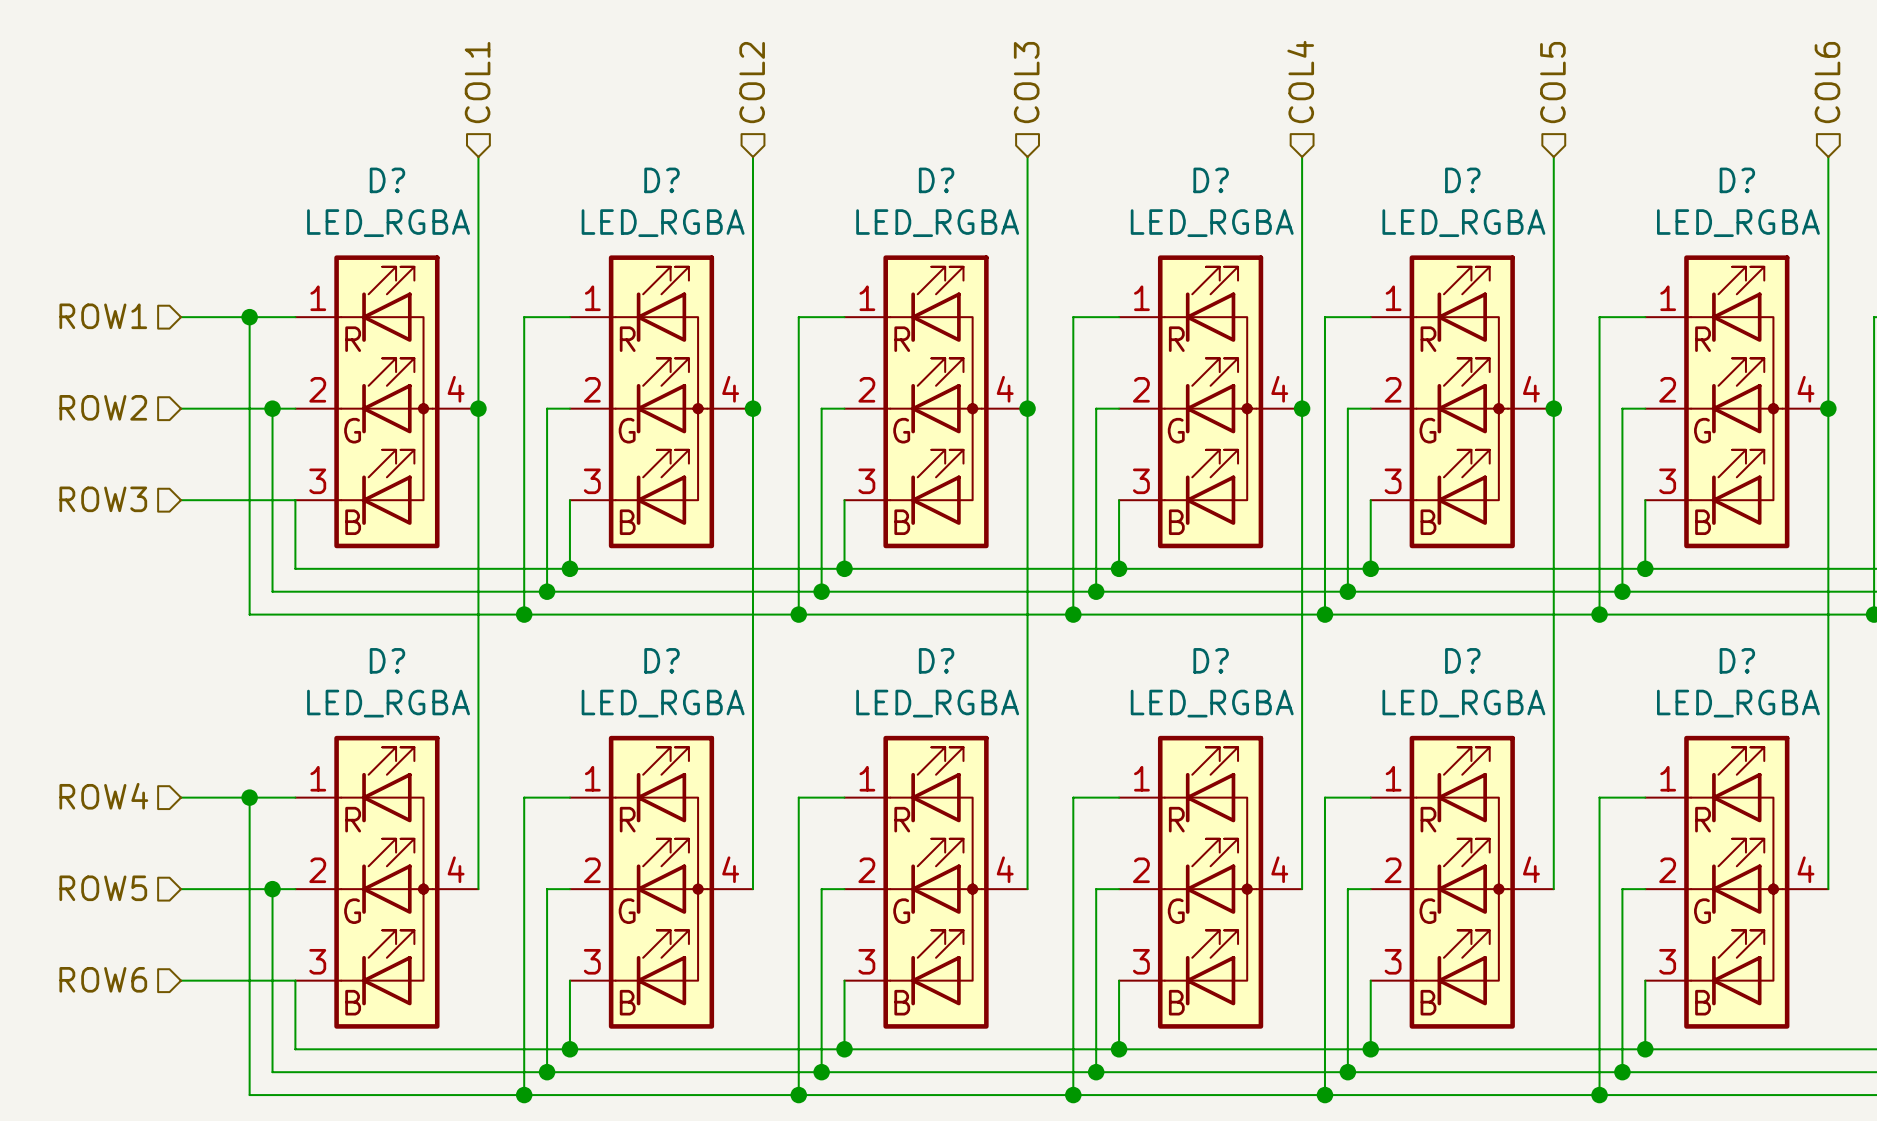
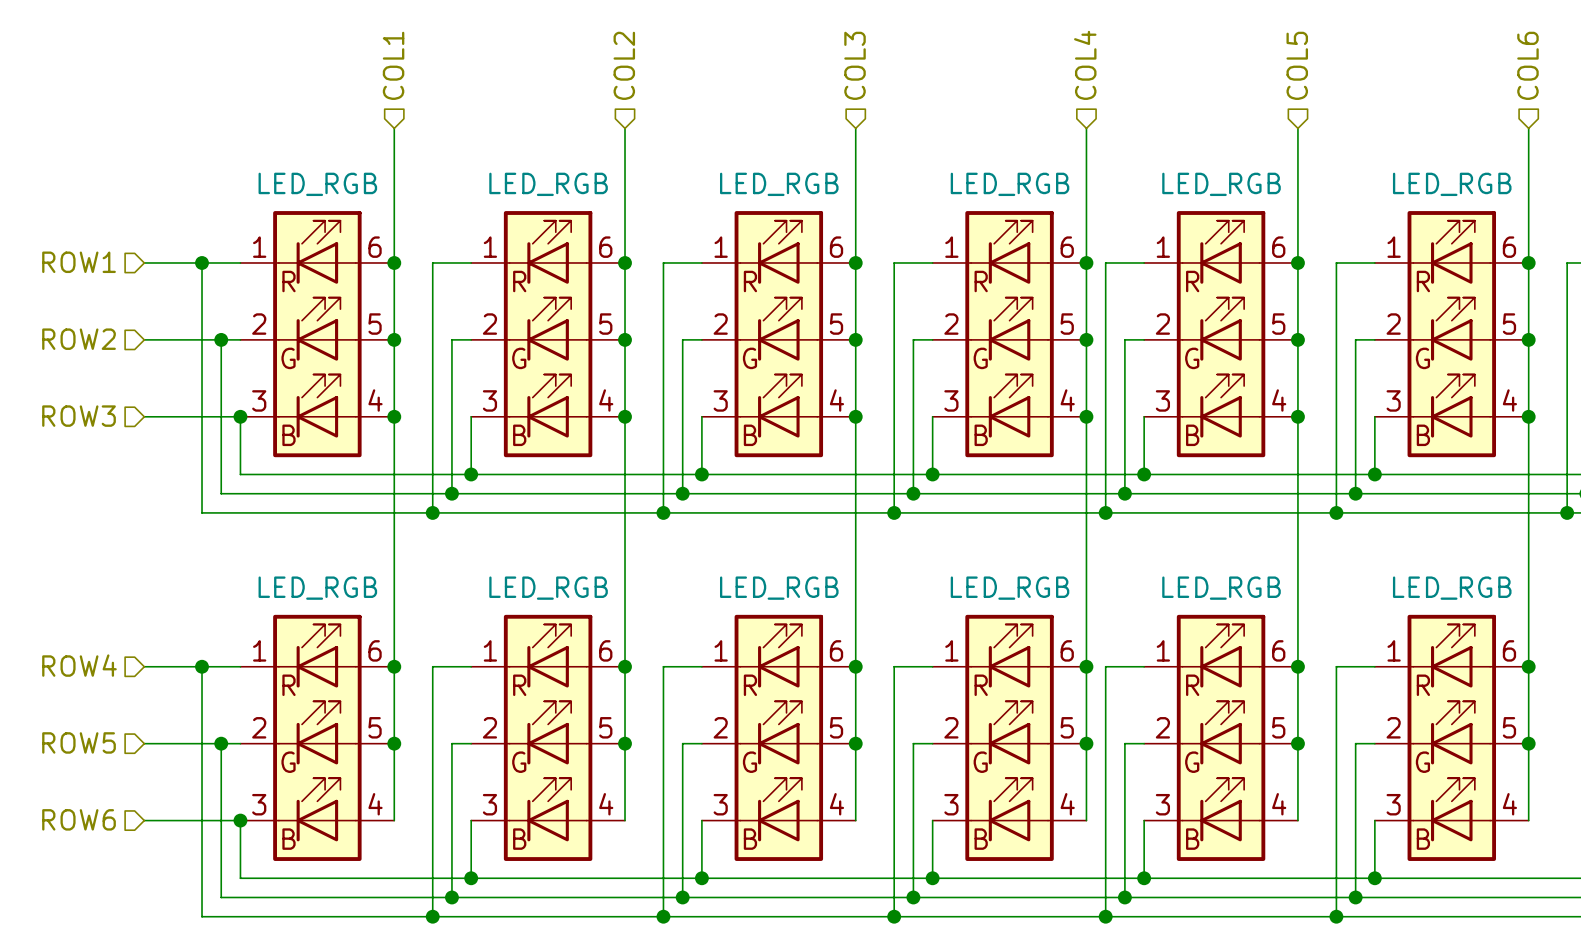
junction: none -> (394, 262)
junction: none -> (625, 262)
junction: none -> (855, 262)
junction: none -> (1086, 262)
junction: none -> (1297, 262)
junction: none -> (1528, 262)
D?: LED_RGBA (386, 401) -> none
part: none -> LED_RGB (317, 334)
D?: LED_RGBA (661, 401) -> none
part: none -> LED_RGB (548, 334)
D?: LED_RGBA (936, 401) -> none
part: none -> LED_RGB (778, 334)
D?: LED_RGBA (1210, 401) -> none
part: none -> LED_RGB (1009, 334)
D?: LED_RGBA (1462, 401) -> none
part: none -> LED_RGB (1221, 334)
D?: LED_RGBA (1736, 401) -> none
part: none -> LED_RGB (1451, 334)
junction: none -> (240, 416)
junction: none -> (394, 416)
junction: none -> (625, 416)
junction: none -> (855, 416)
junction: none -> (1086, 416)
junction: none -> (1297, 416)
junction: none -> (1528, 416)
junction: none -> (394, 666)
junction: none -> (625, 666)
junction: none -> (855, 666)
junction: none -> (1086, 666)
junction: none -> (1297, 666)
junction: none -> (1528, 666)
D?: LED_RGBA (386, 882) -> none
part: none -> LED_RGB (317, 737)
D?: LED_RGBA (661, 882) -> none
part: none -> LED_RGB (548, 737)
D?: LED_RGBA (936, 882) -> none
part: none -> LED_RGB (778, 737)
D?: LED_RGBA (1210, 882) -> none
part: none -> LED_RGB (1009, 737)
D?: LED_RGBA (1462, 882) -> none
part: none -> LED_RGB (1221, 737)
D?: LED_RGBA (1736, 882) -> none
part: none -> LED_RGB (1451, 737)
wire: none -> (394, 743) (394, 820)
junction: none -> (394, 743)
wire: none -> (625, 743) (625, 820)
junction: none -> (625, 743)
wire: none -> (855, 743) (855, 820)
junction: none -> (855, 743)
wire: none -> (1086, 743) (1086, 820)
junction: none -> (1086, 743)
wire: none -> (1297, 743) (1297, 820)
junction: none -> (1297, 743)
wire: none -> (1528, 743) (1528, 820)
junction: none -> (1528, 743)
junction: none -> (240, 820)

